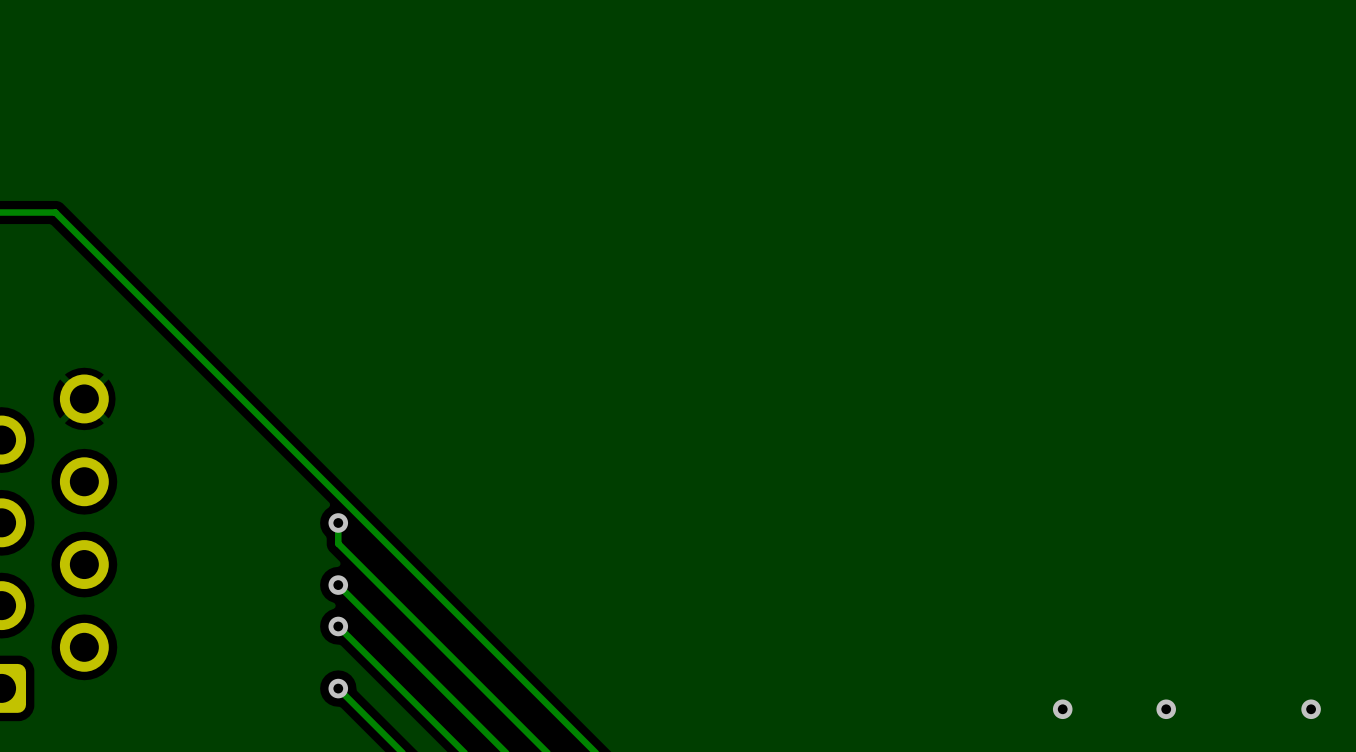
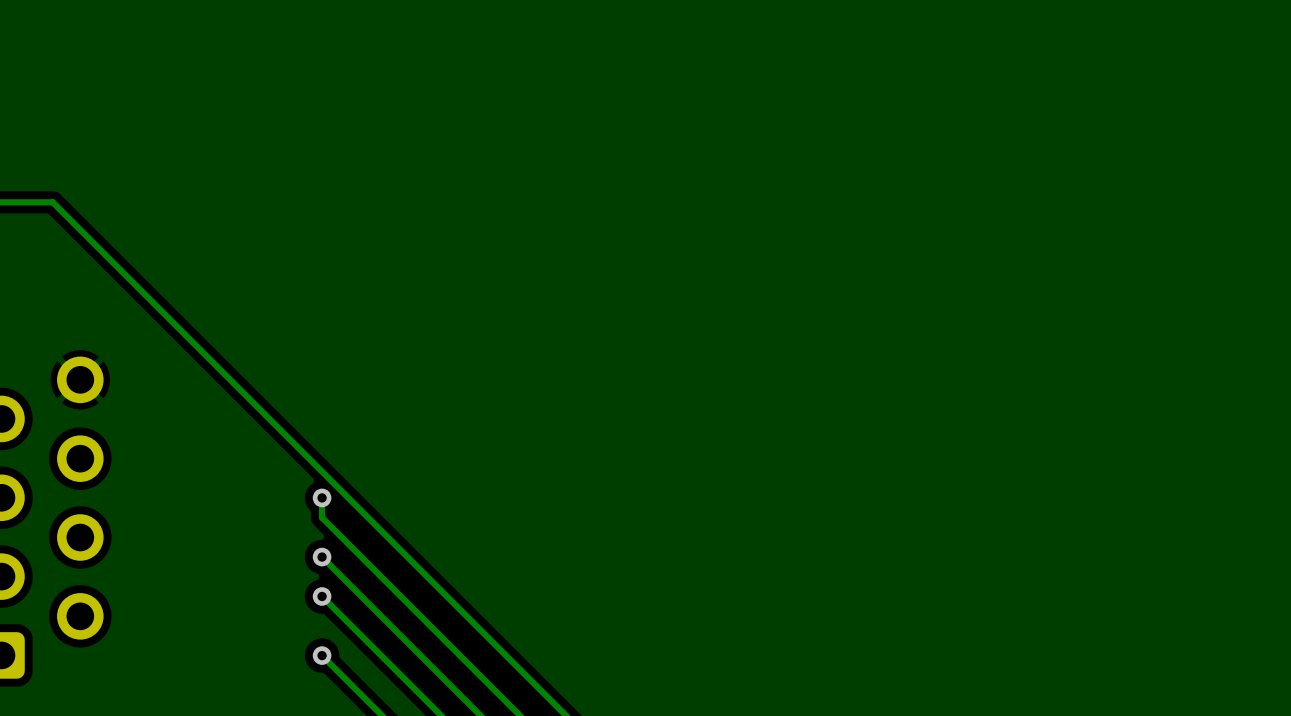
via: (1062, 709) -> none
via: (1166, 709) -> none
via: (1311, 709) -> none

